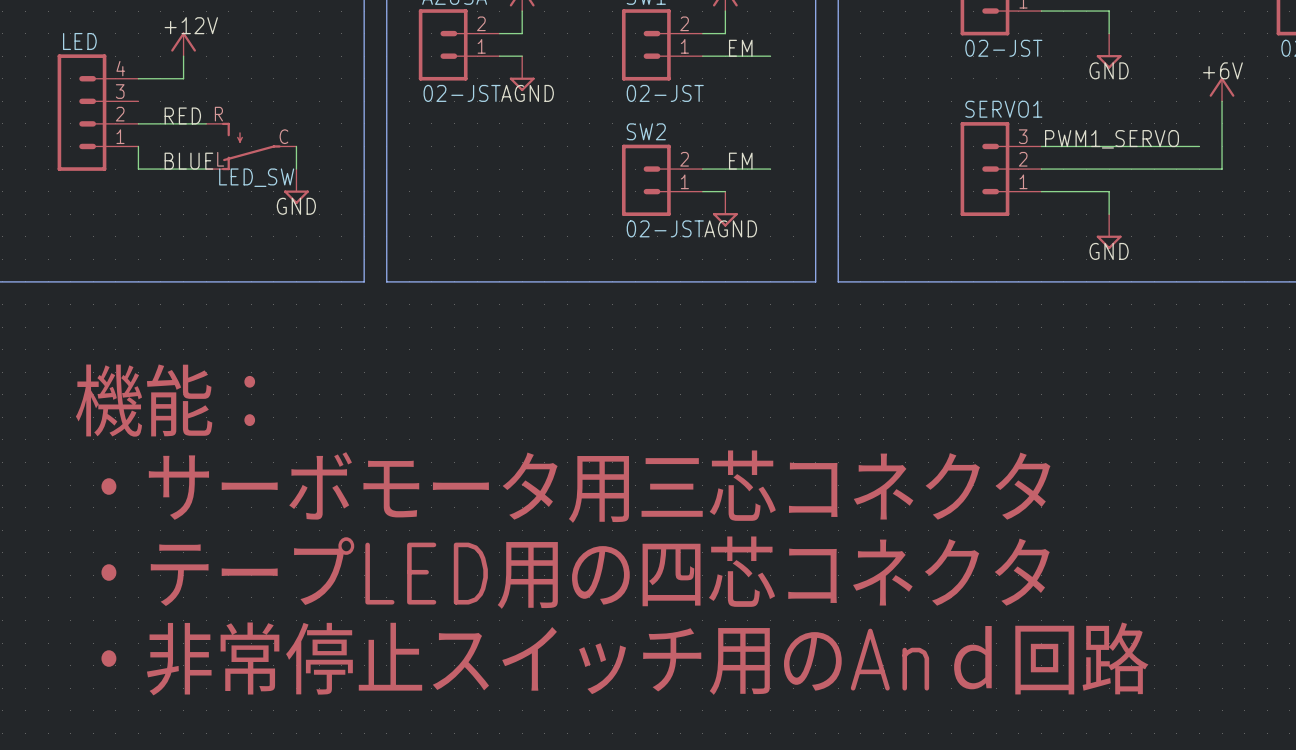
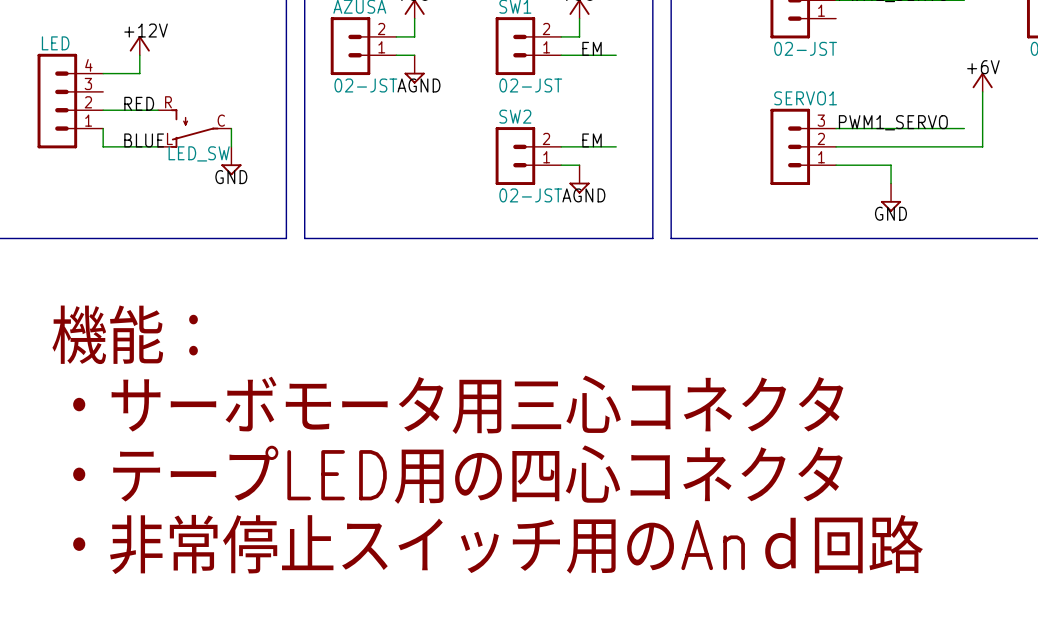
wire: (1041, 11) (1109, 11) (1109, 33) -> none
power symbol: (1109, 51) -> none
label: GND (1109, 70) -> none
text: ・サーボモータ用三芯コネクタ (575, 486) -> ・サーボモータ用三心コネクタ (458, 404)
text: ・テープLED用の四芯コネクタ (575, 572) -> ・テープLED用の四心コネクタ (457, 474)

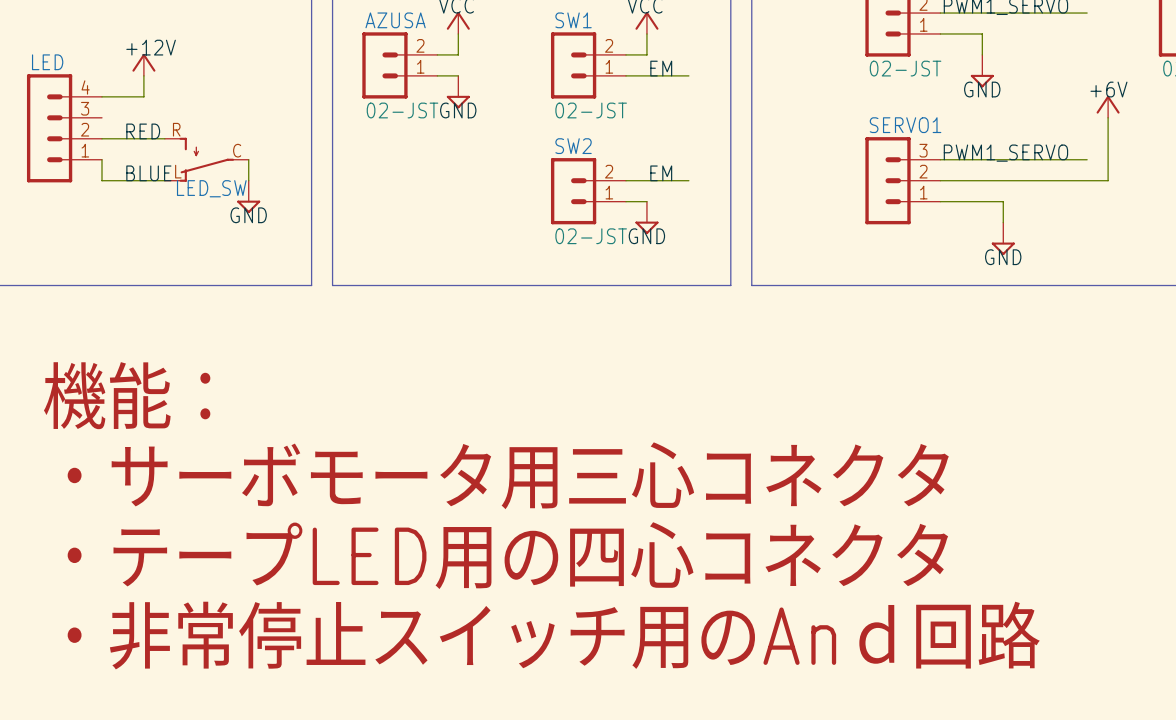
wire: none -> (940, 33) (982, 33) (982, 54)
power symbol: none -> (982, 71)
label: none -> GND (982, 89)
label: AGND (418, 85) -> GND (458, 110)
label: AGND (583, 195) -> GND (646, 236)

